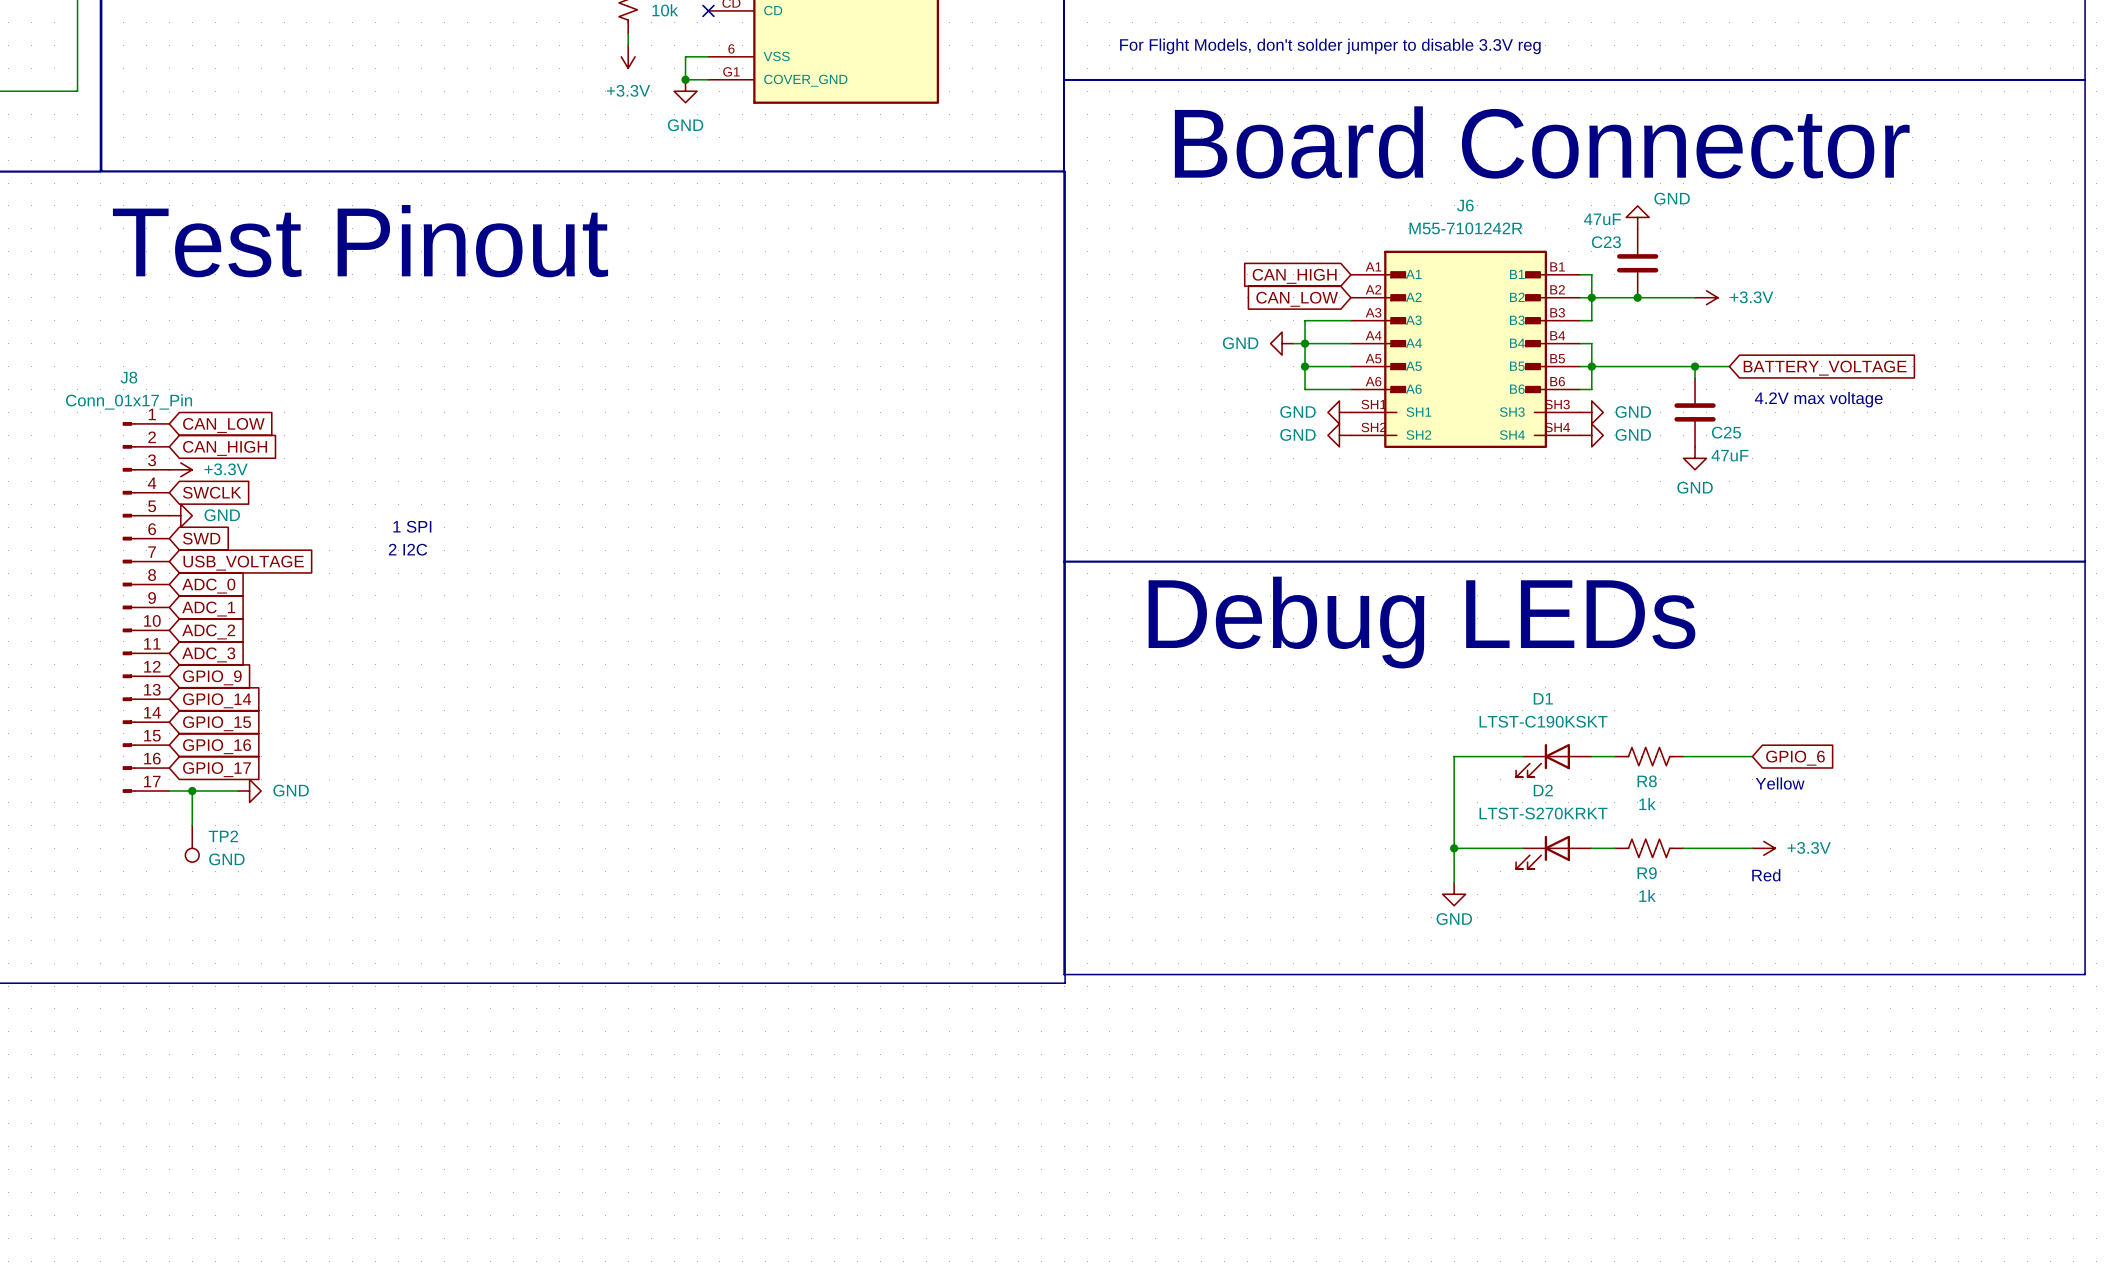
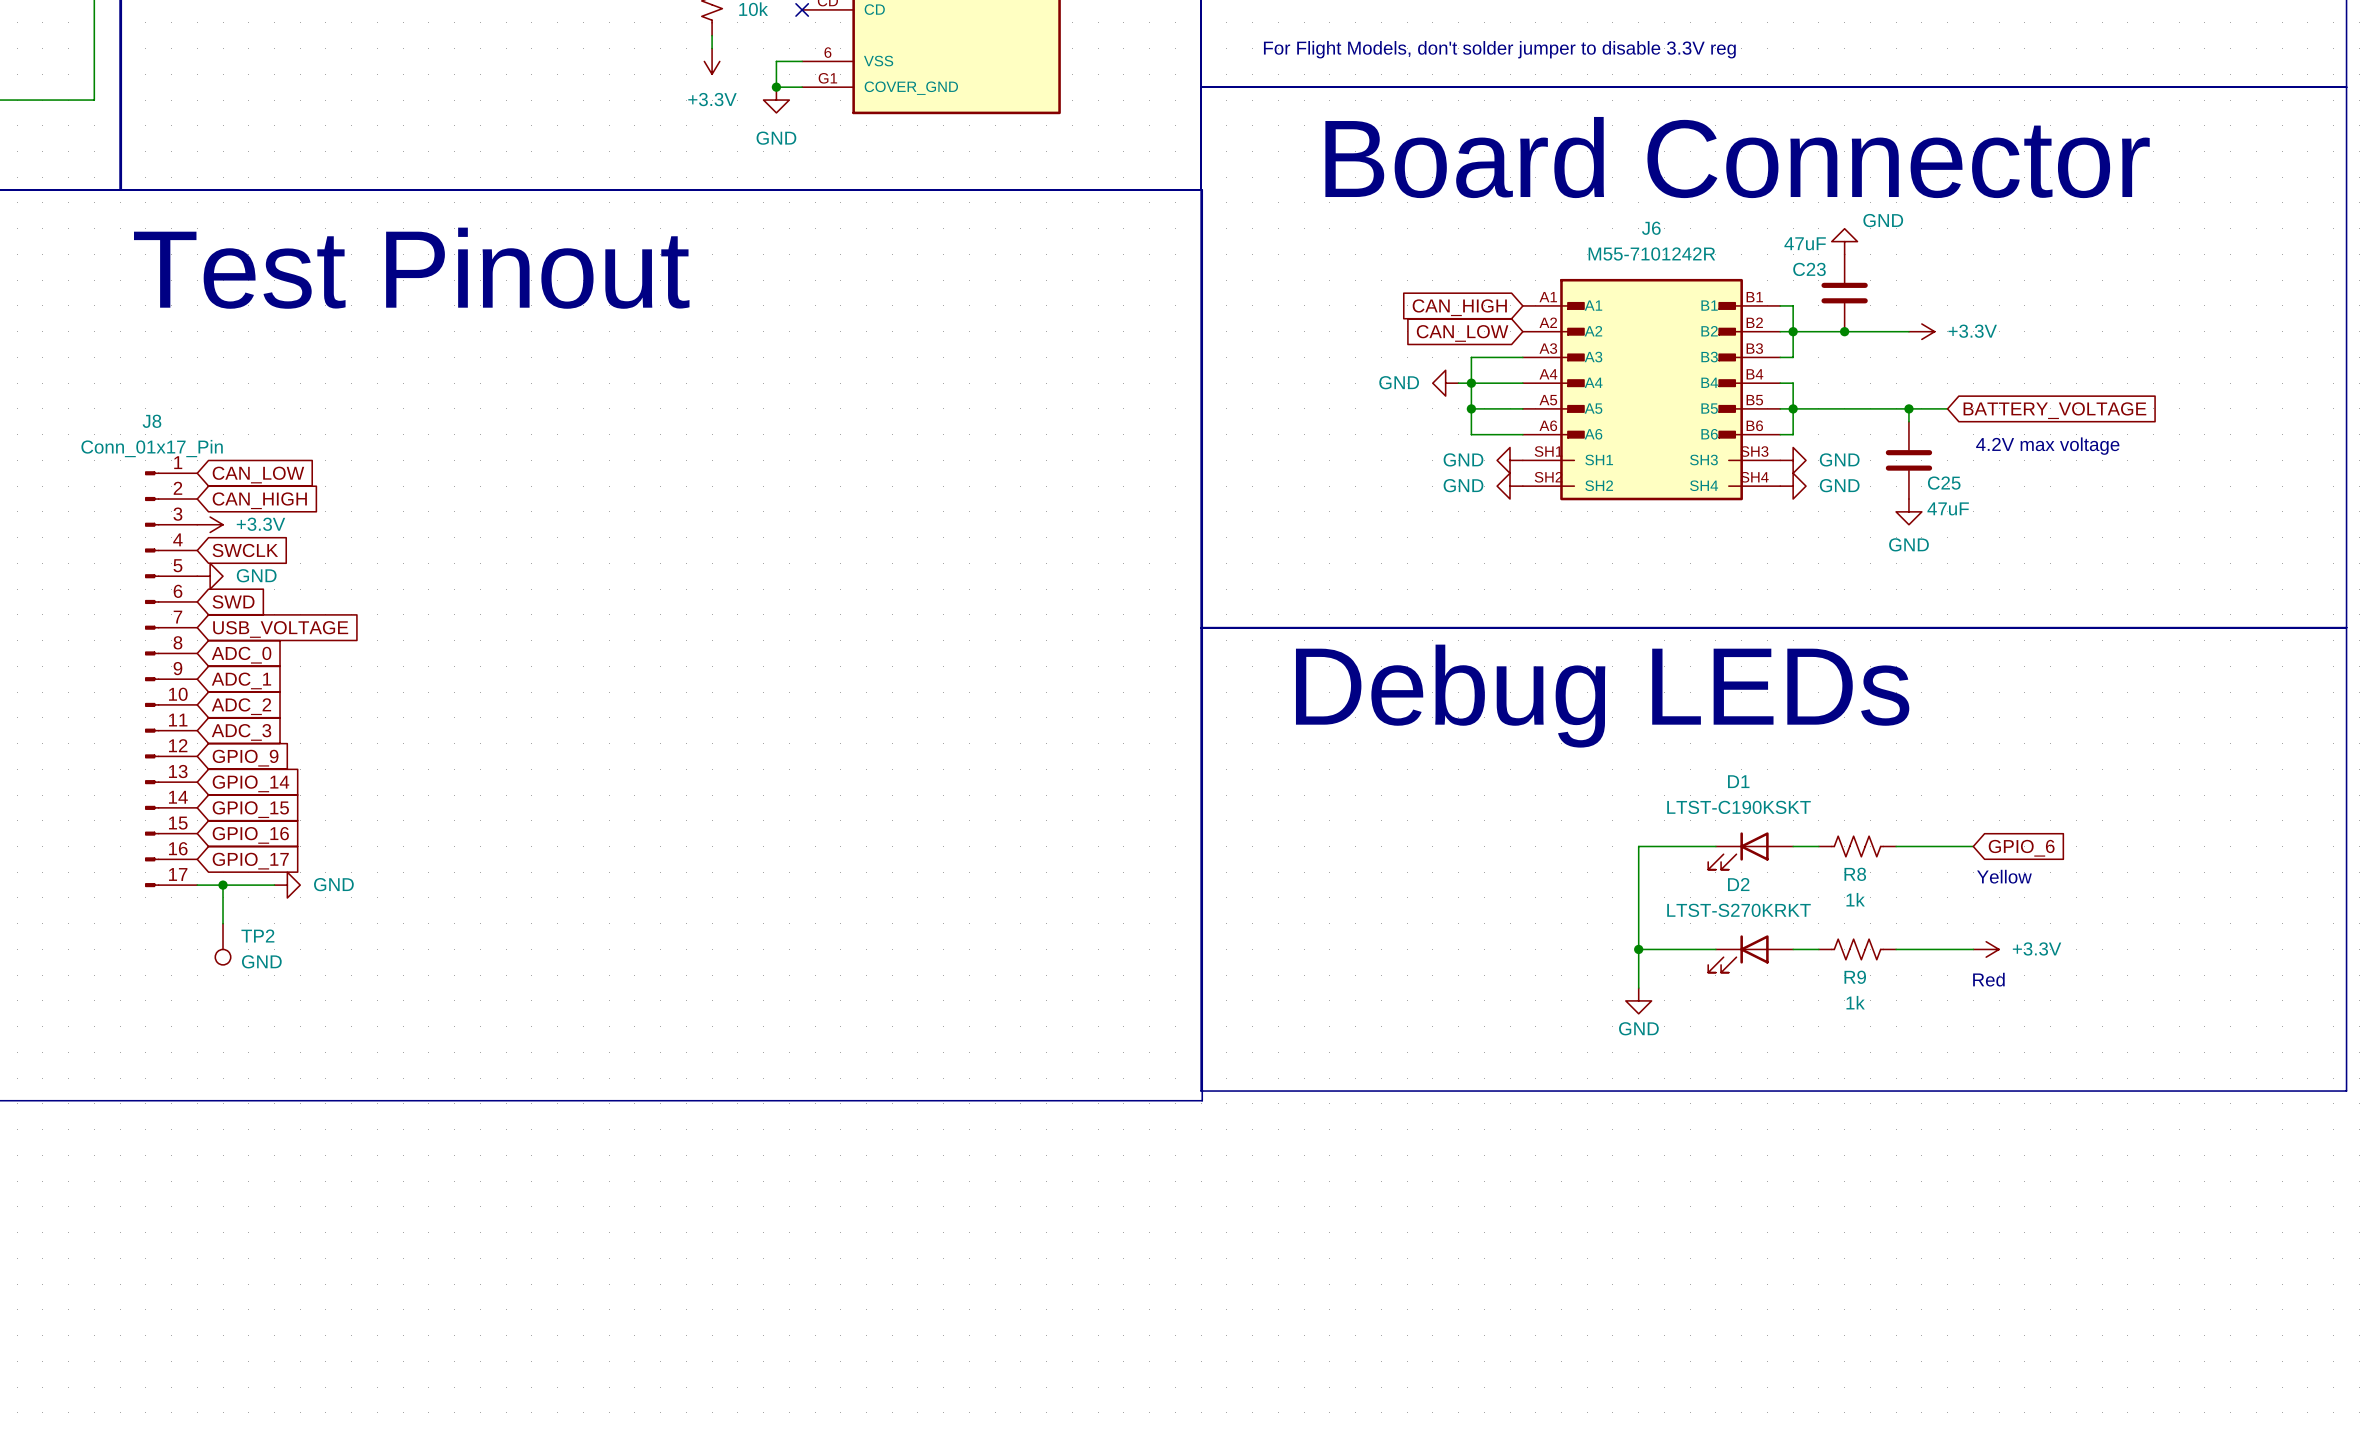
text: 1 SPI (412, 526) -> none
text: 2 I2C (408, 549) -> none

